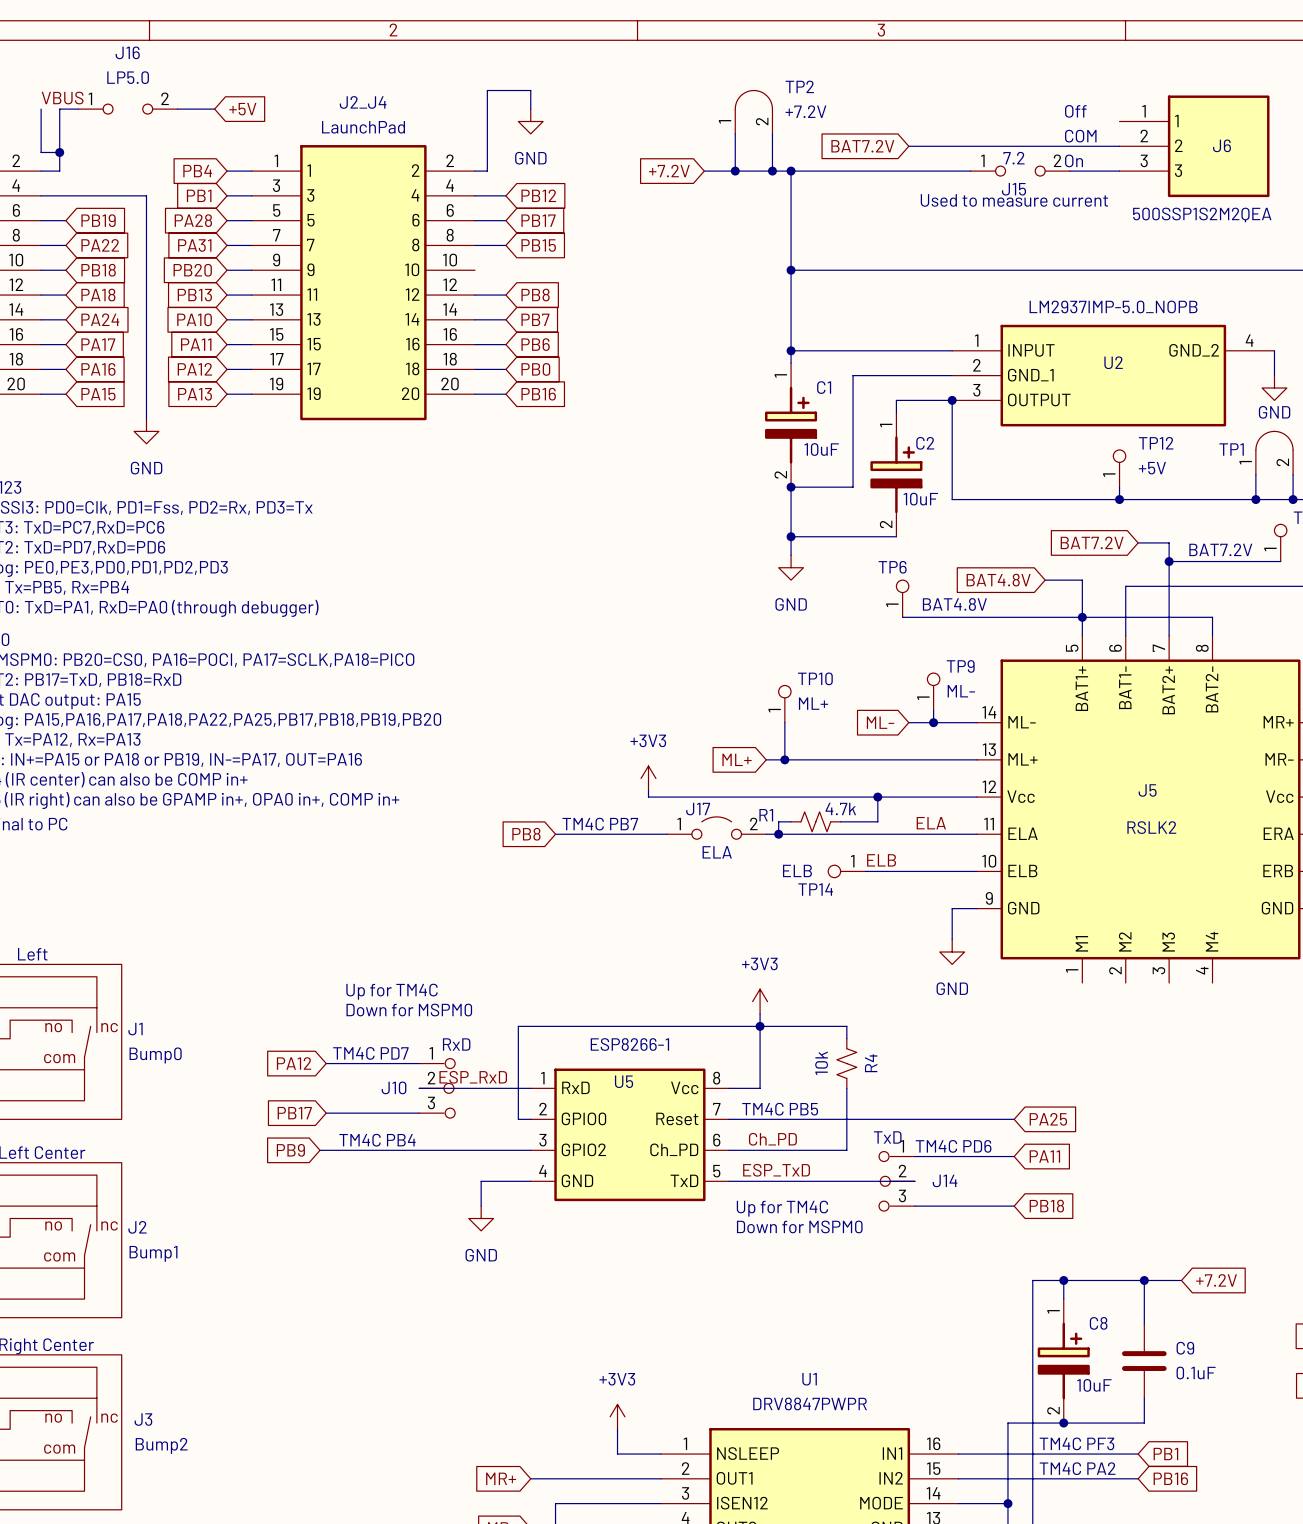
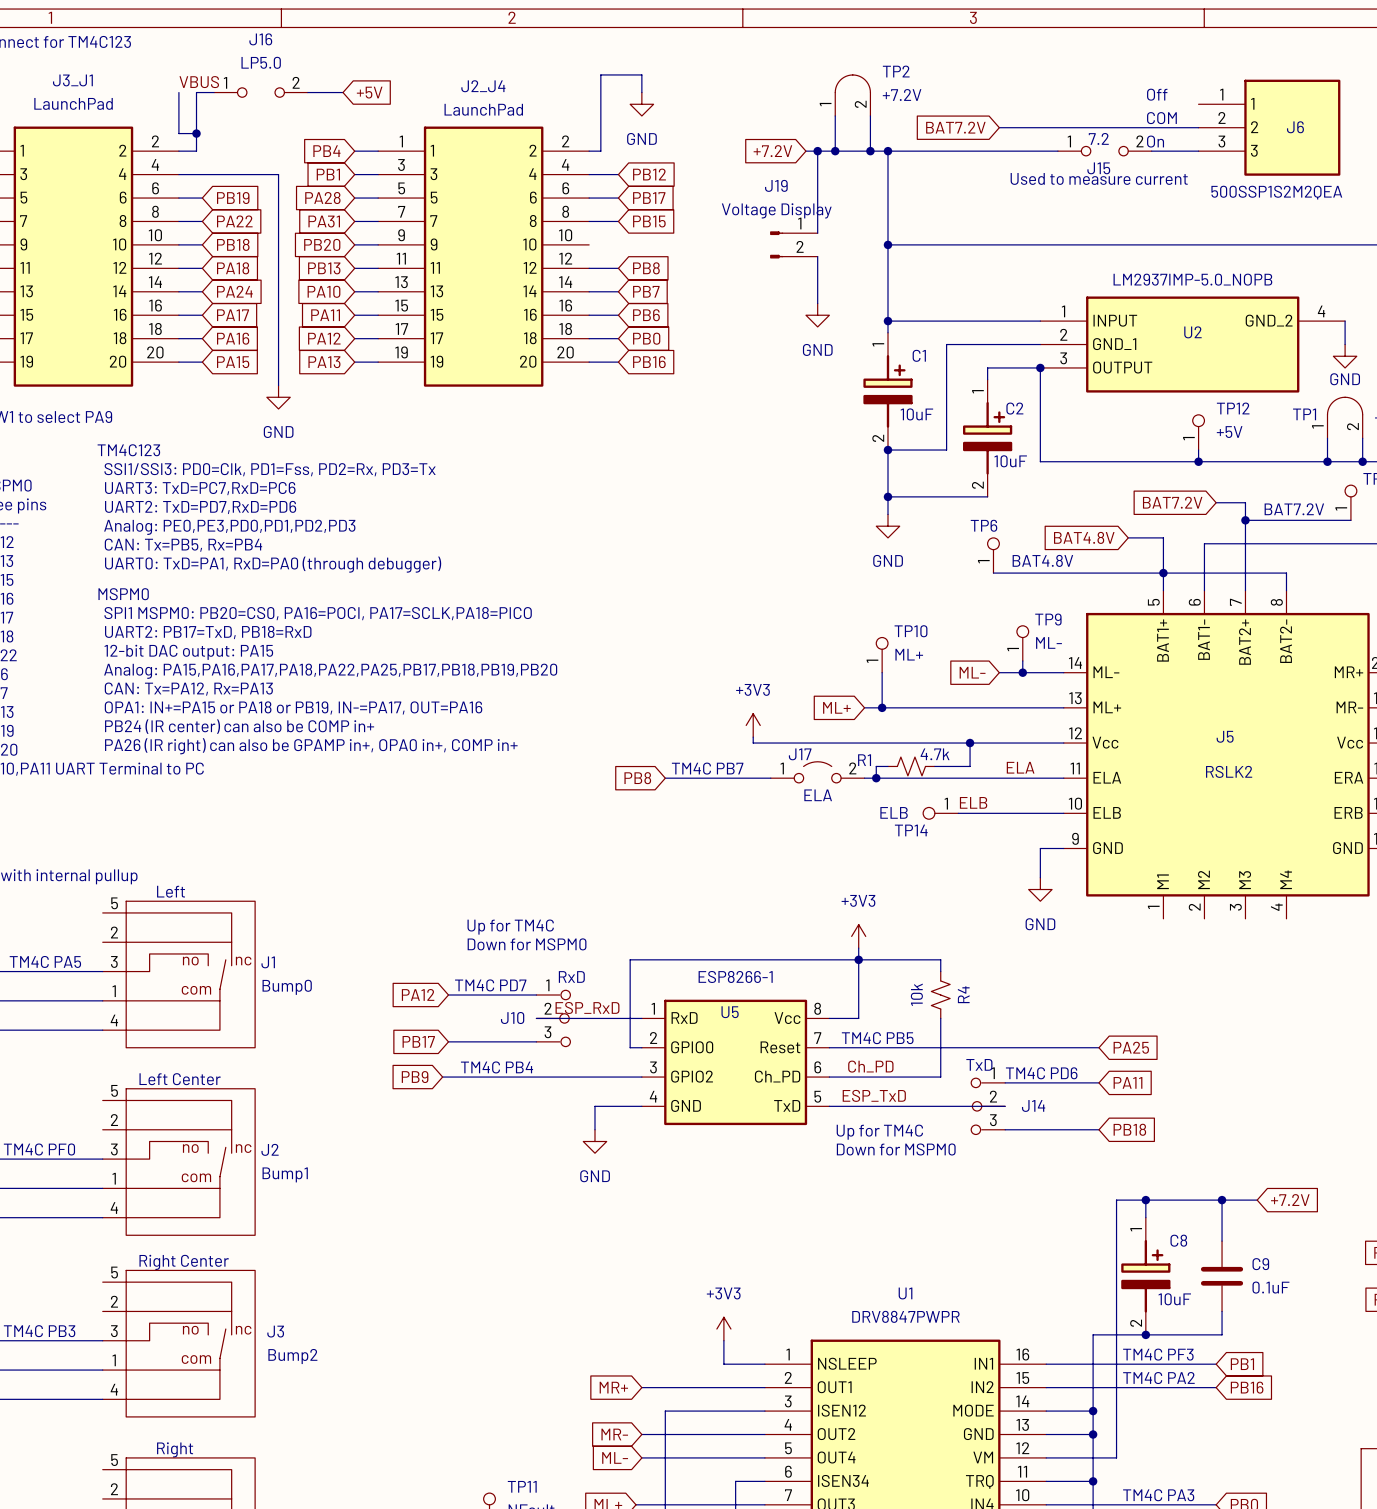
wire: none -> (817, 151) (817, 233)
junction: none -> (817, 151)
J19: none -> Voltage Display (793, 244)
wire: none -> (817, 256) (817, 303)
power symbol: none -> GND (817, 315)

